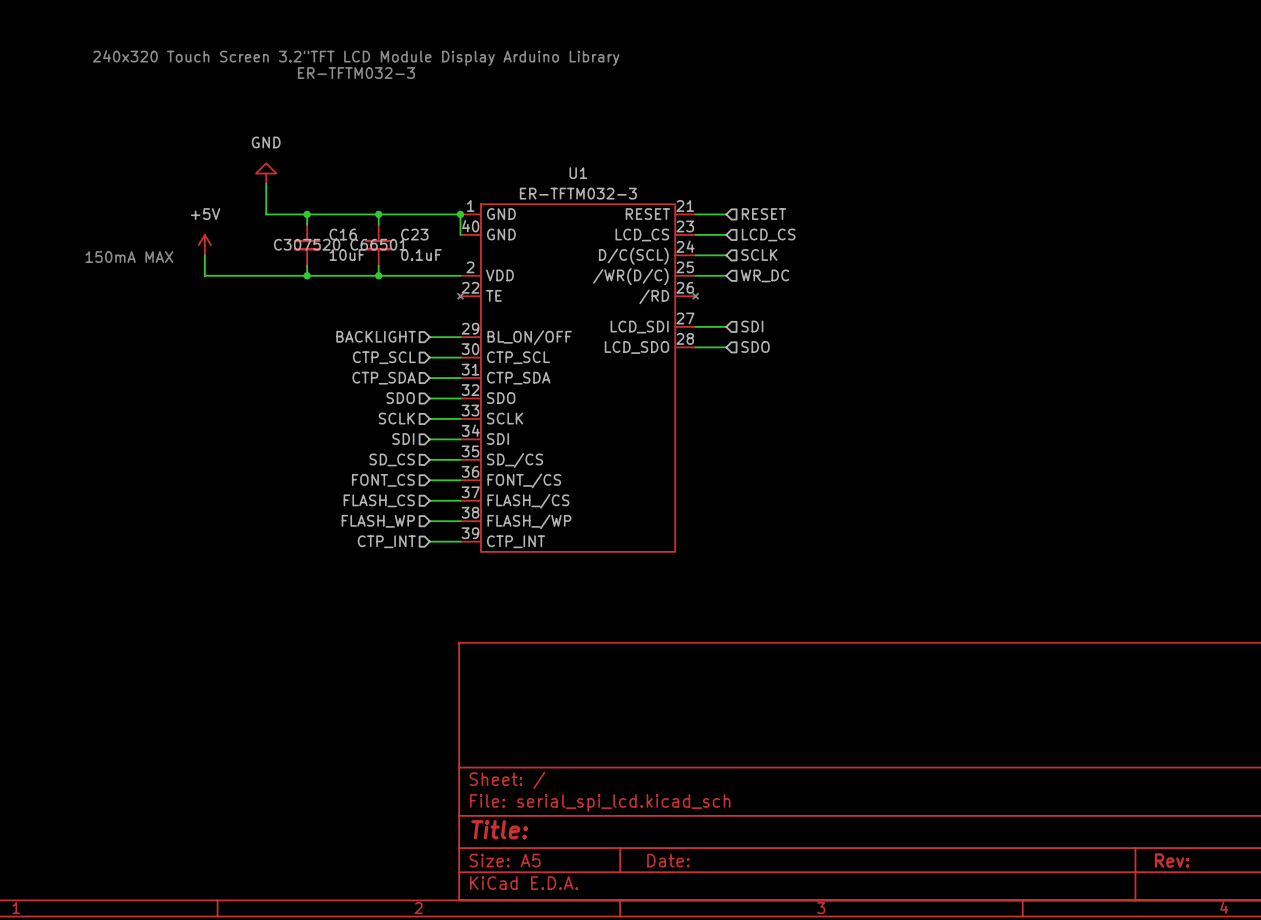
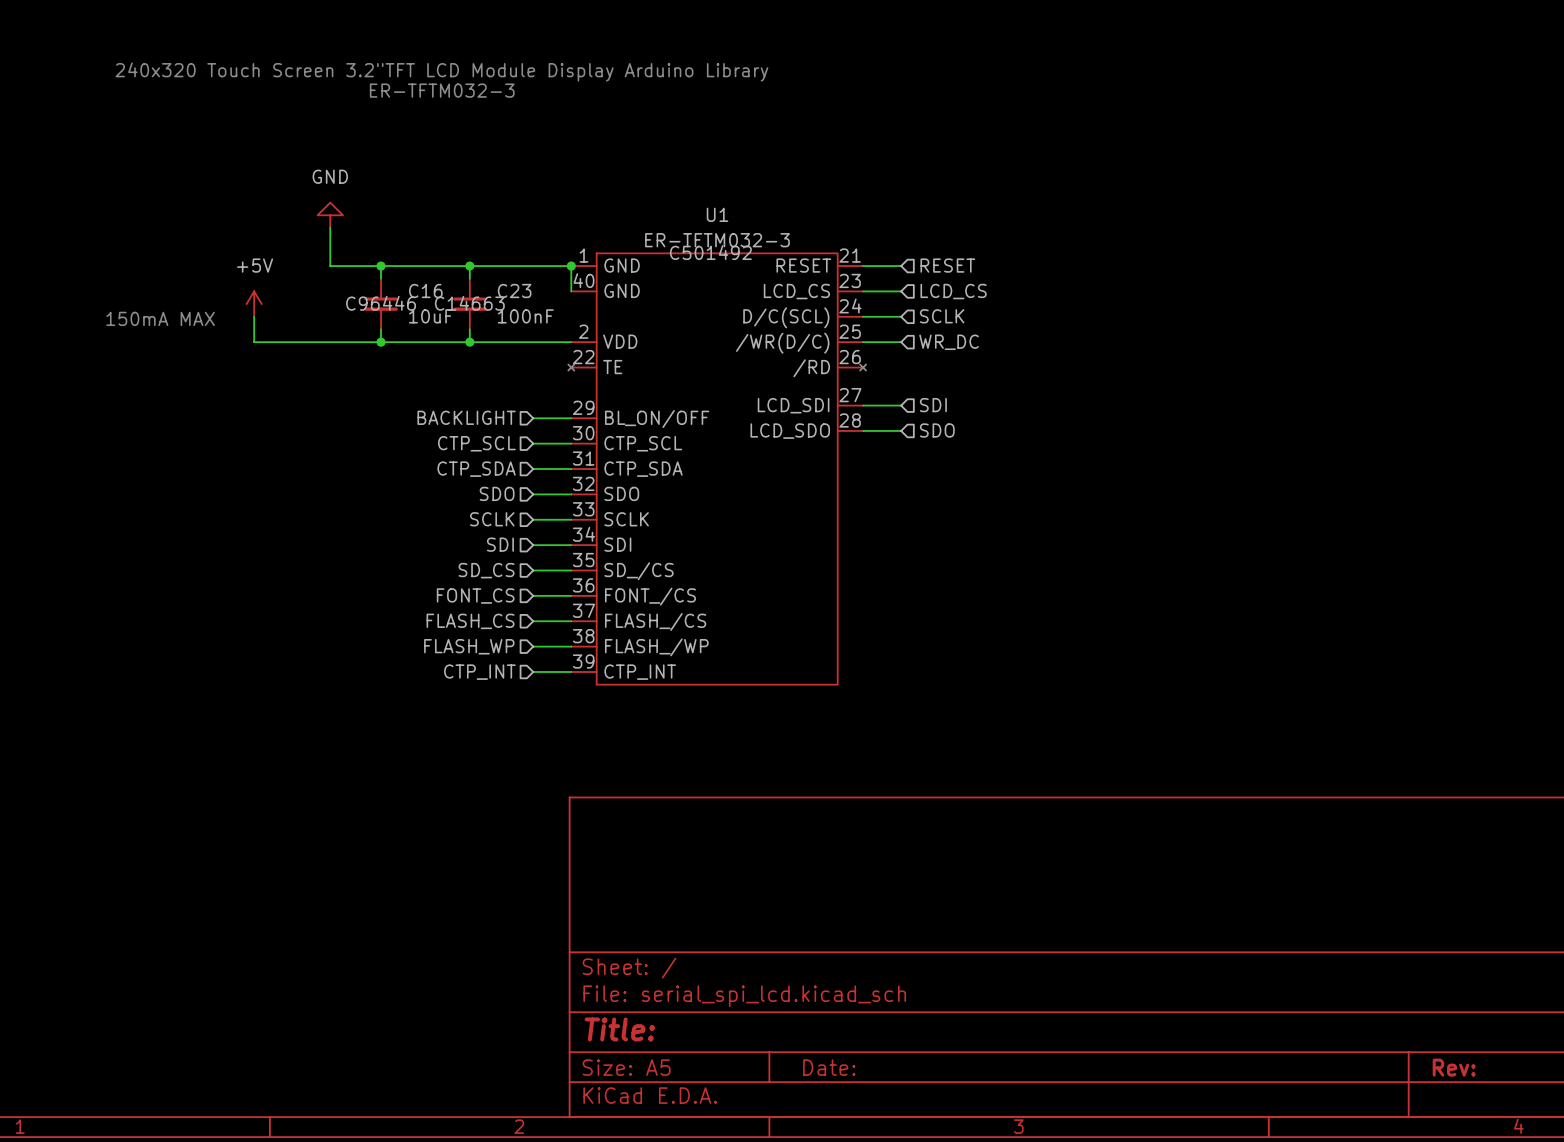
U1 text: none -> C501492 (710, 252)
C16 text: C307520 (307, 244) -> C96446 (381, 303)
C23 text: C66501 (378, 244) -> C14663 (469, 303)
C23 value: 0.1uF (421, 255) -> 100nF (525, 316)

